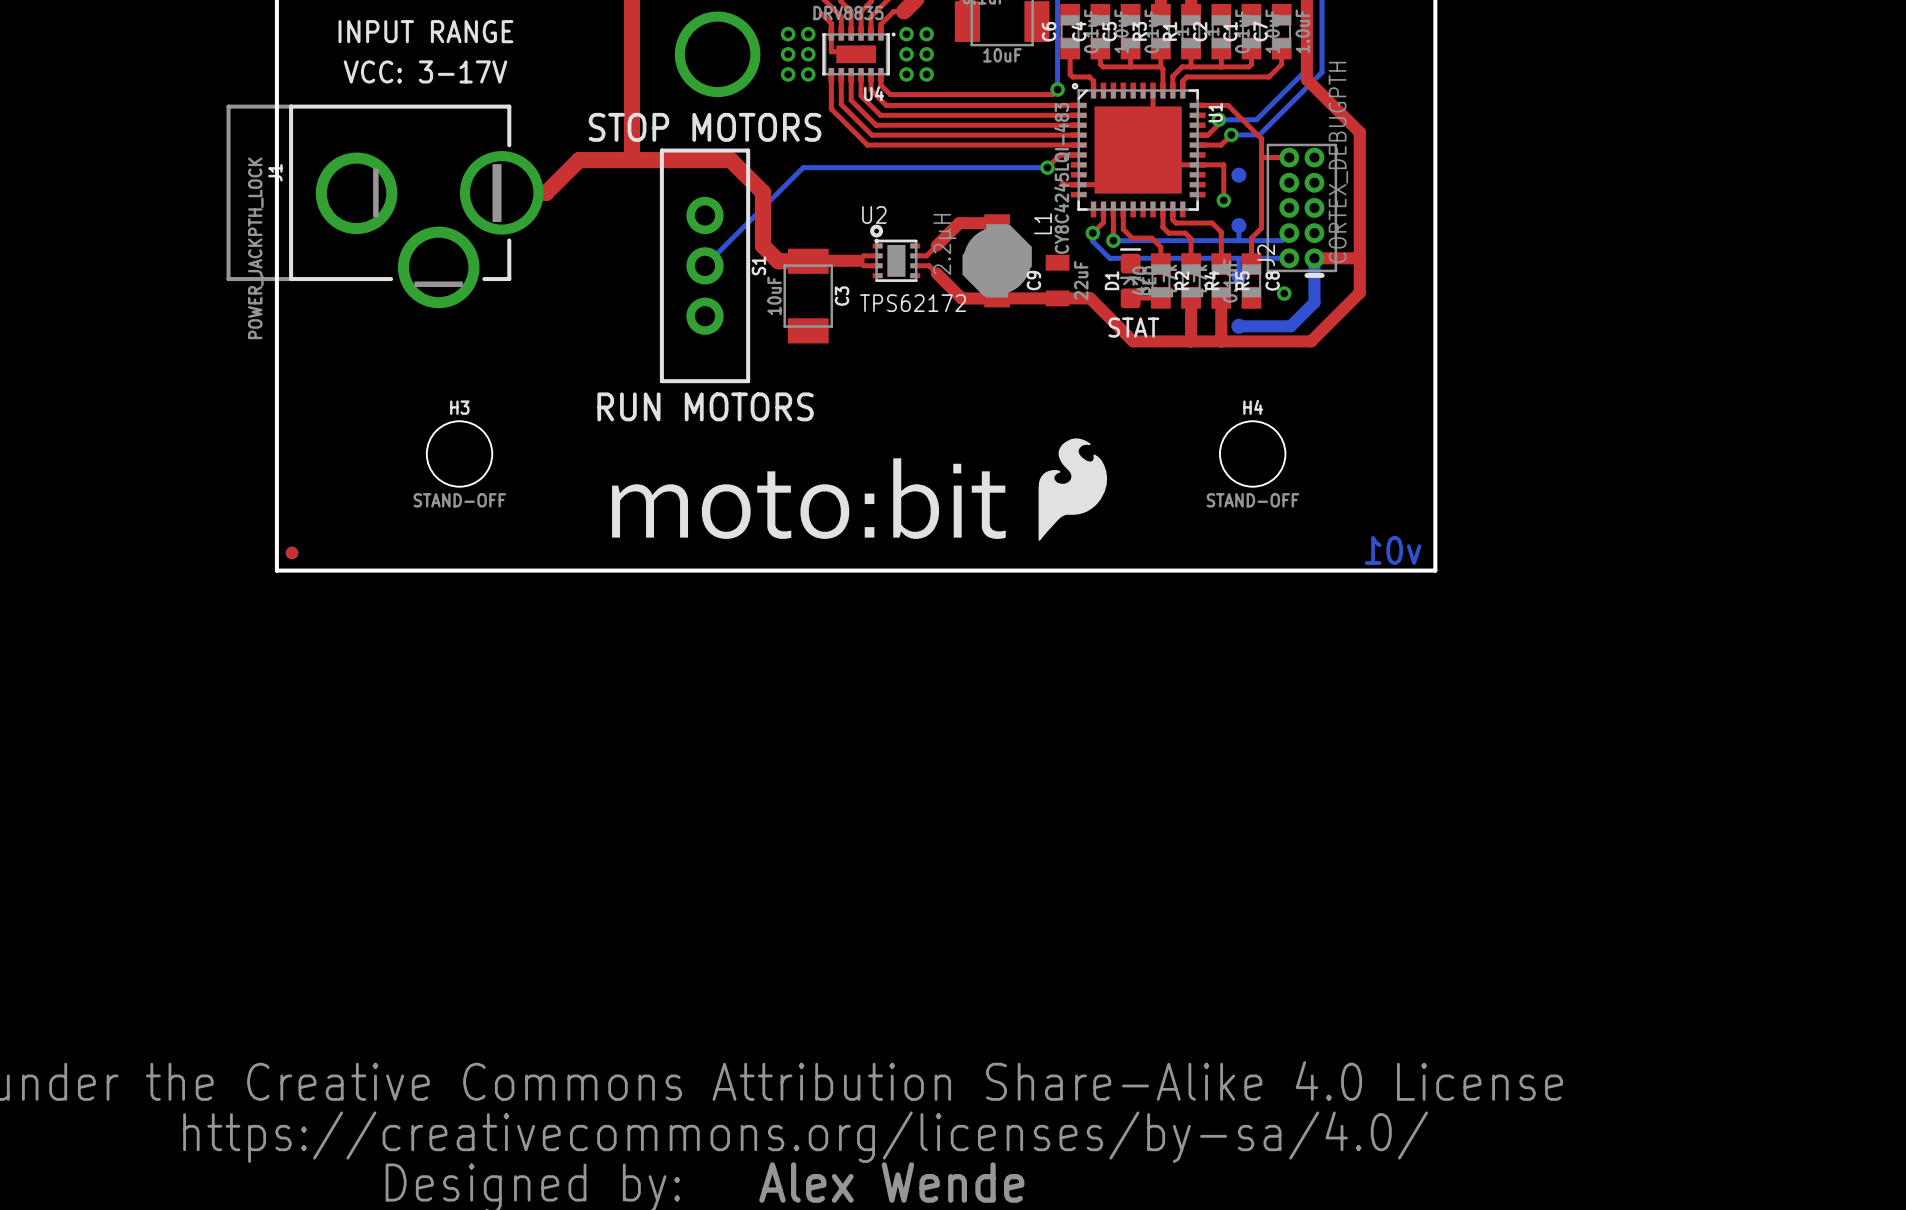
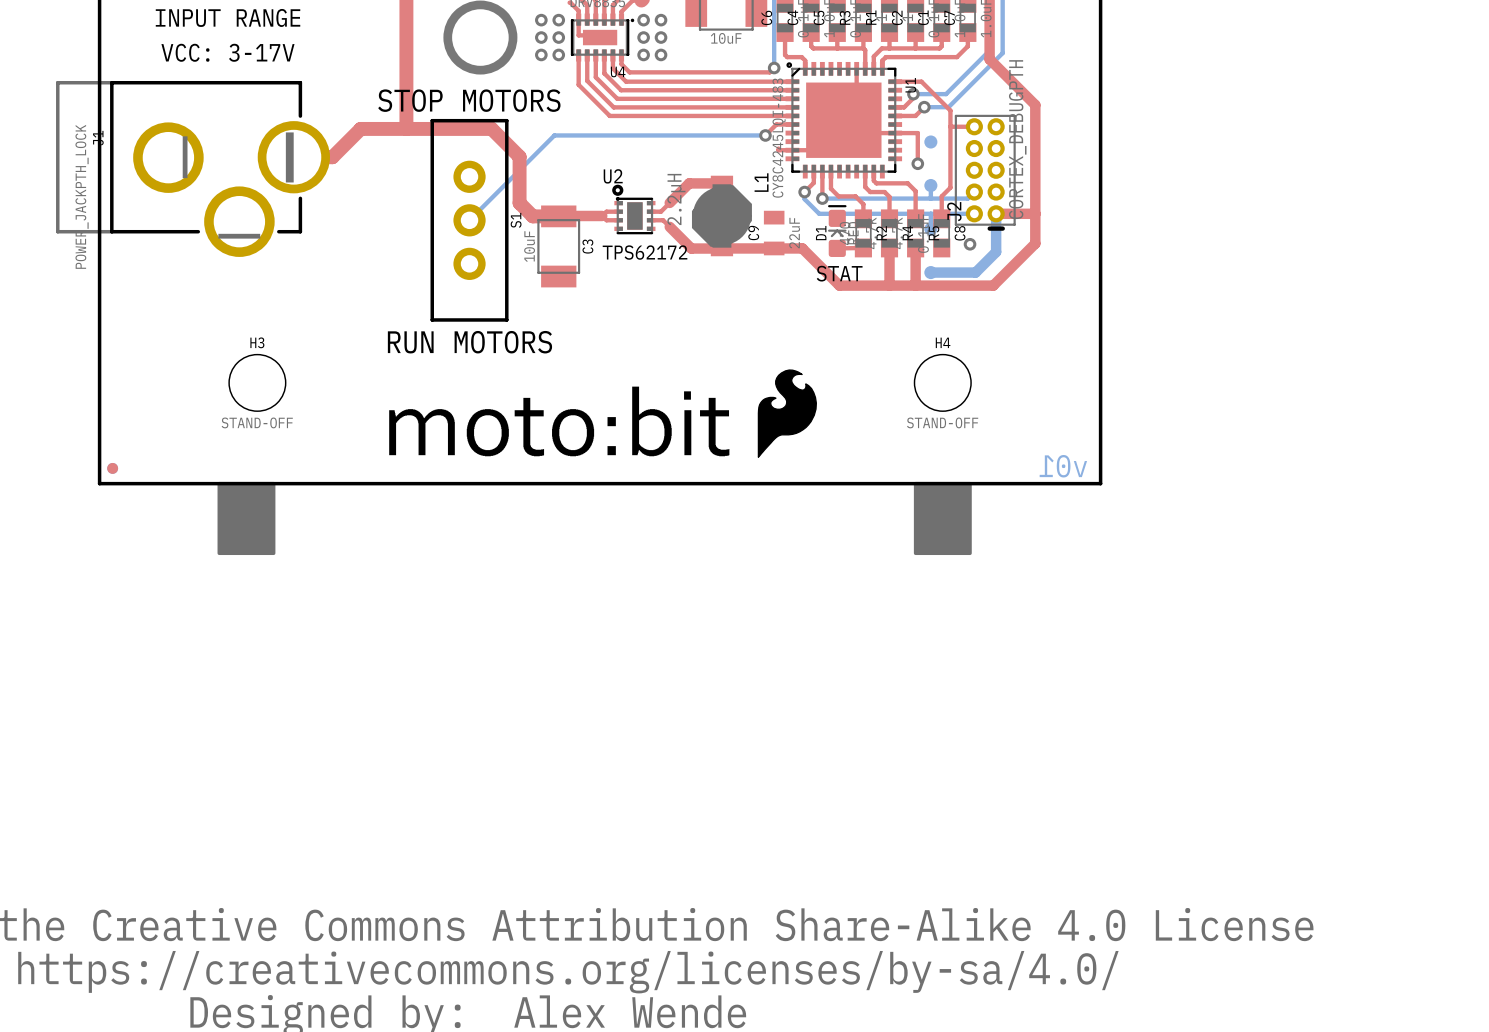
drawing: none -> [217, 481, 276, 556]
drawing: none -> [913, 481, 972, 556]

